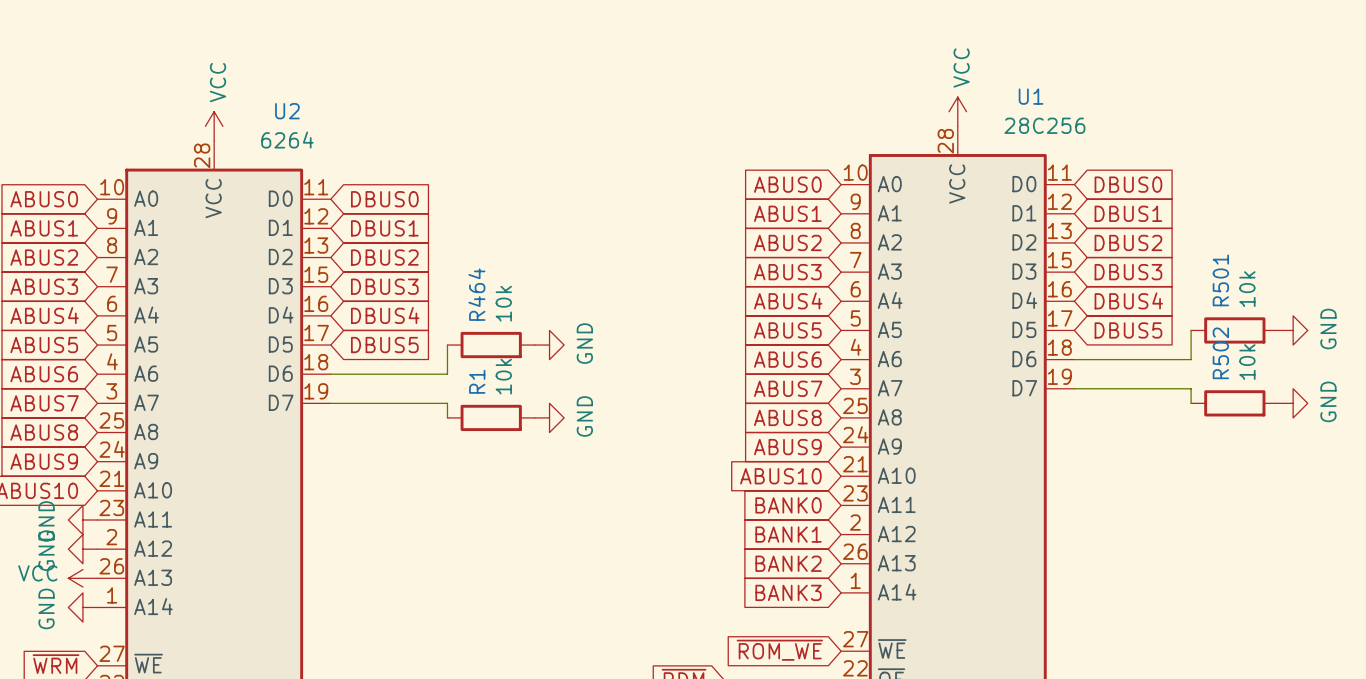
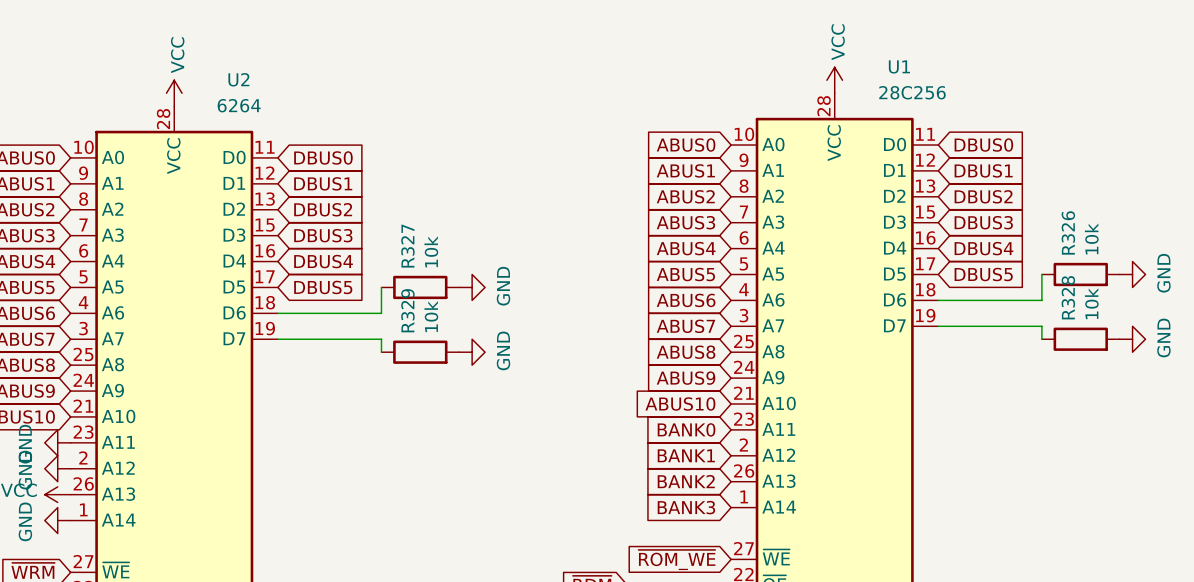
R501 name: R501 (1220, 280) -> R326 (1068, 232)
R464 name: R464 (476, 294) -> R327 (407, 246)
R502 name: R502 (1220, 353) -> R328 (1068, 297)
R1 name: R1 (477, 381) -> R329 (407, 310)

